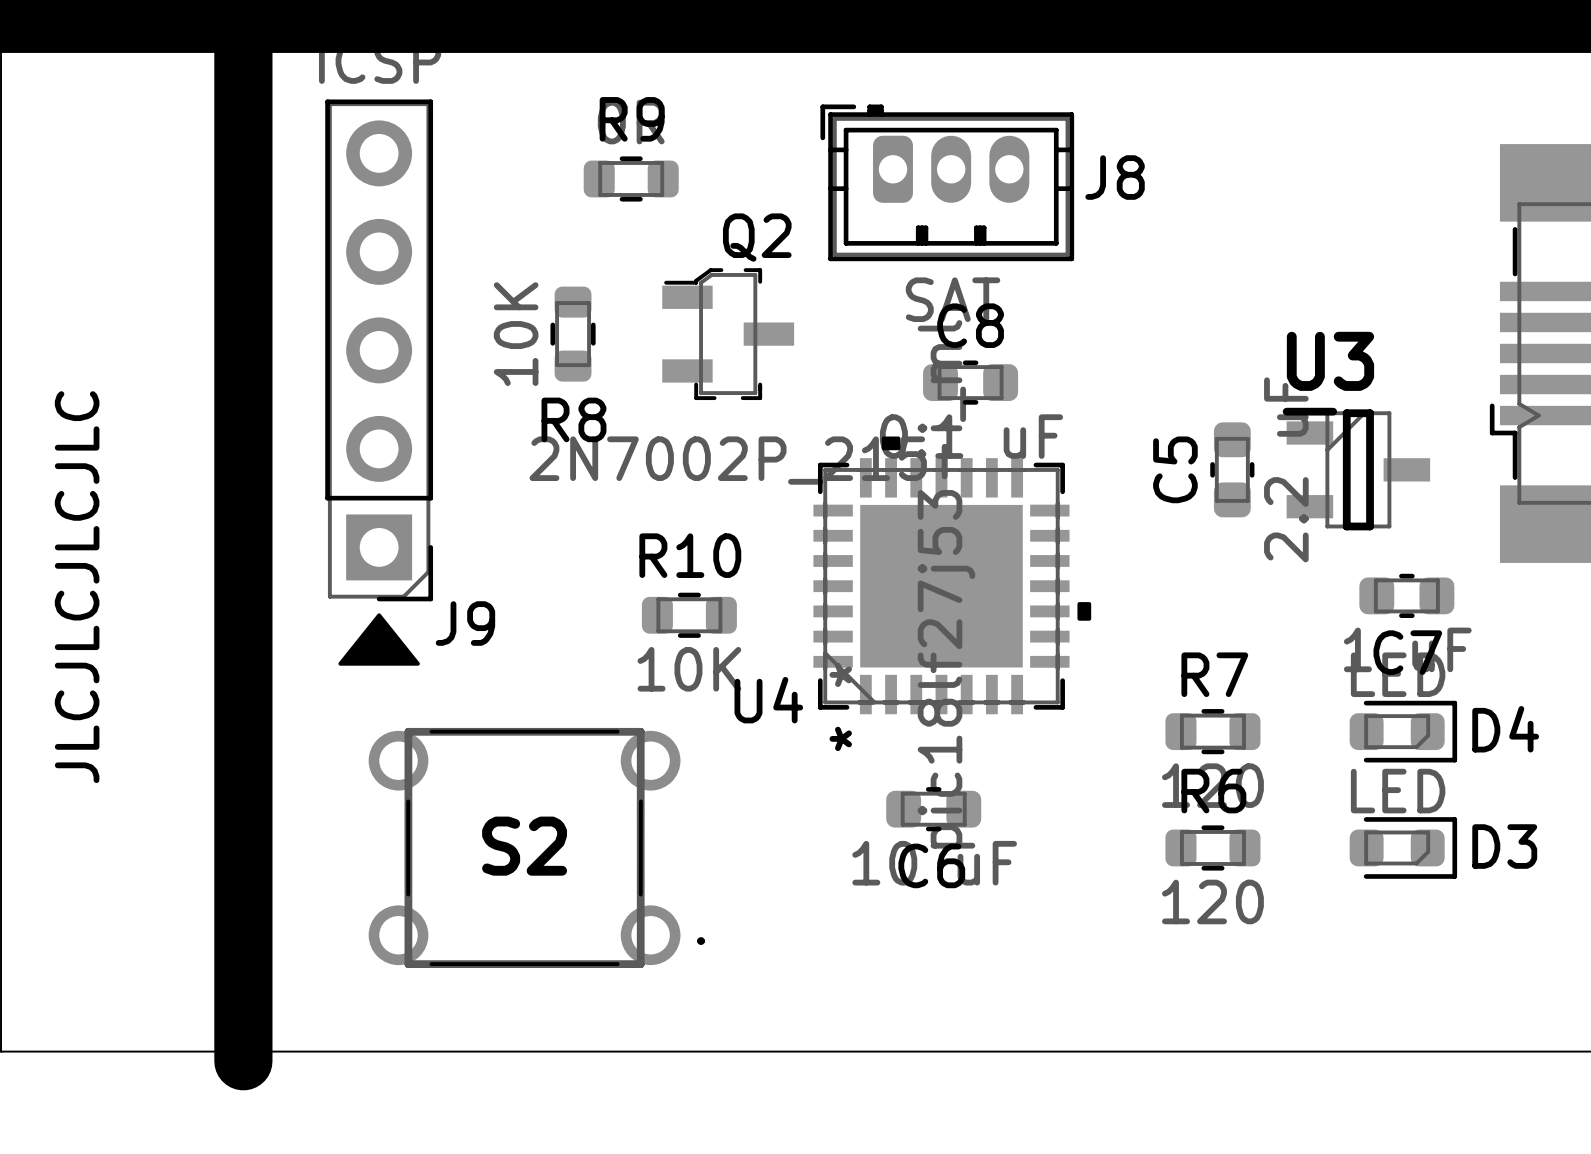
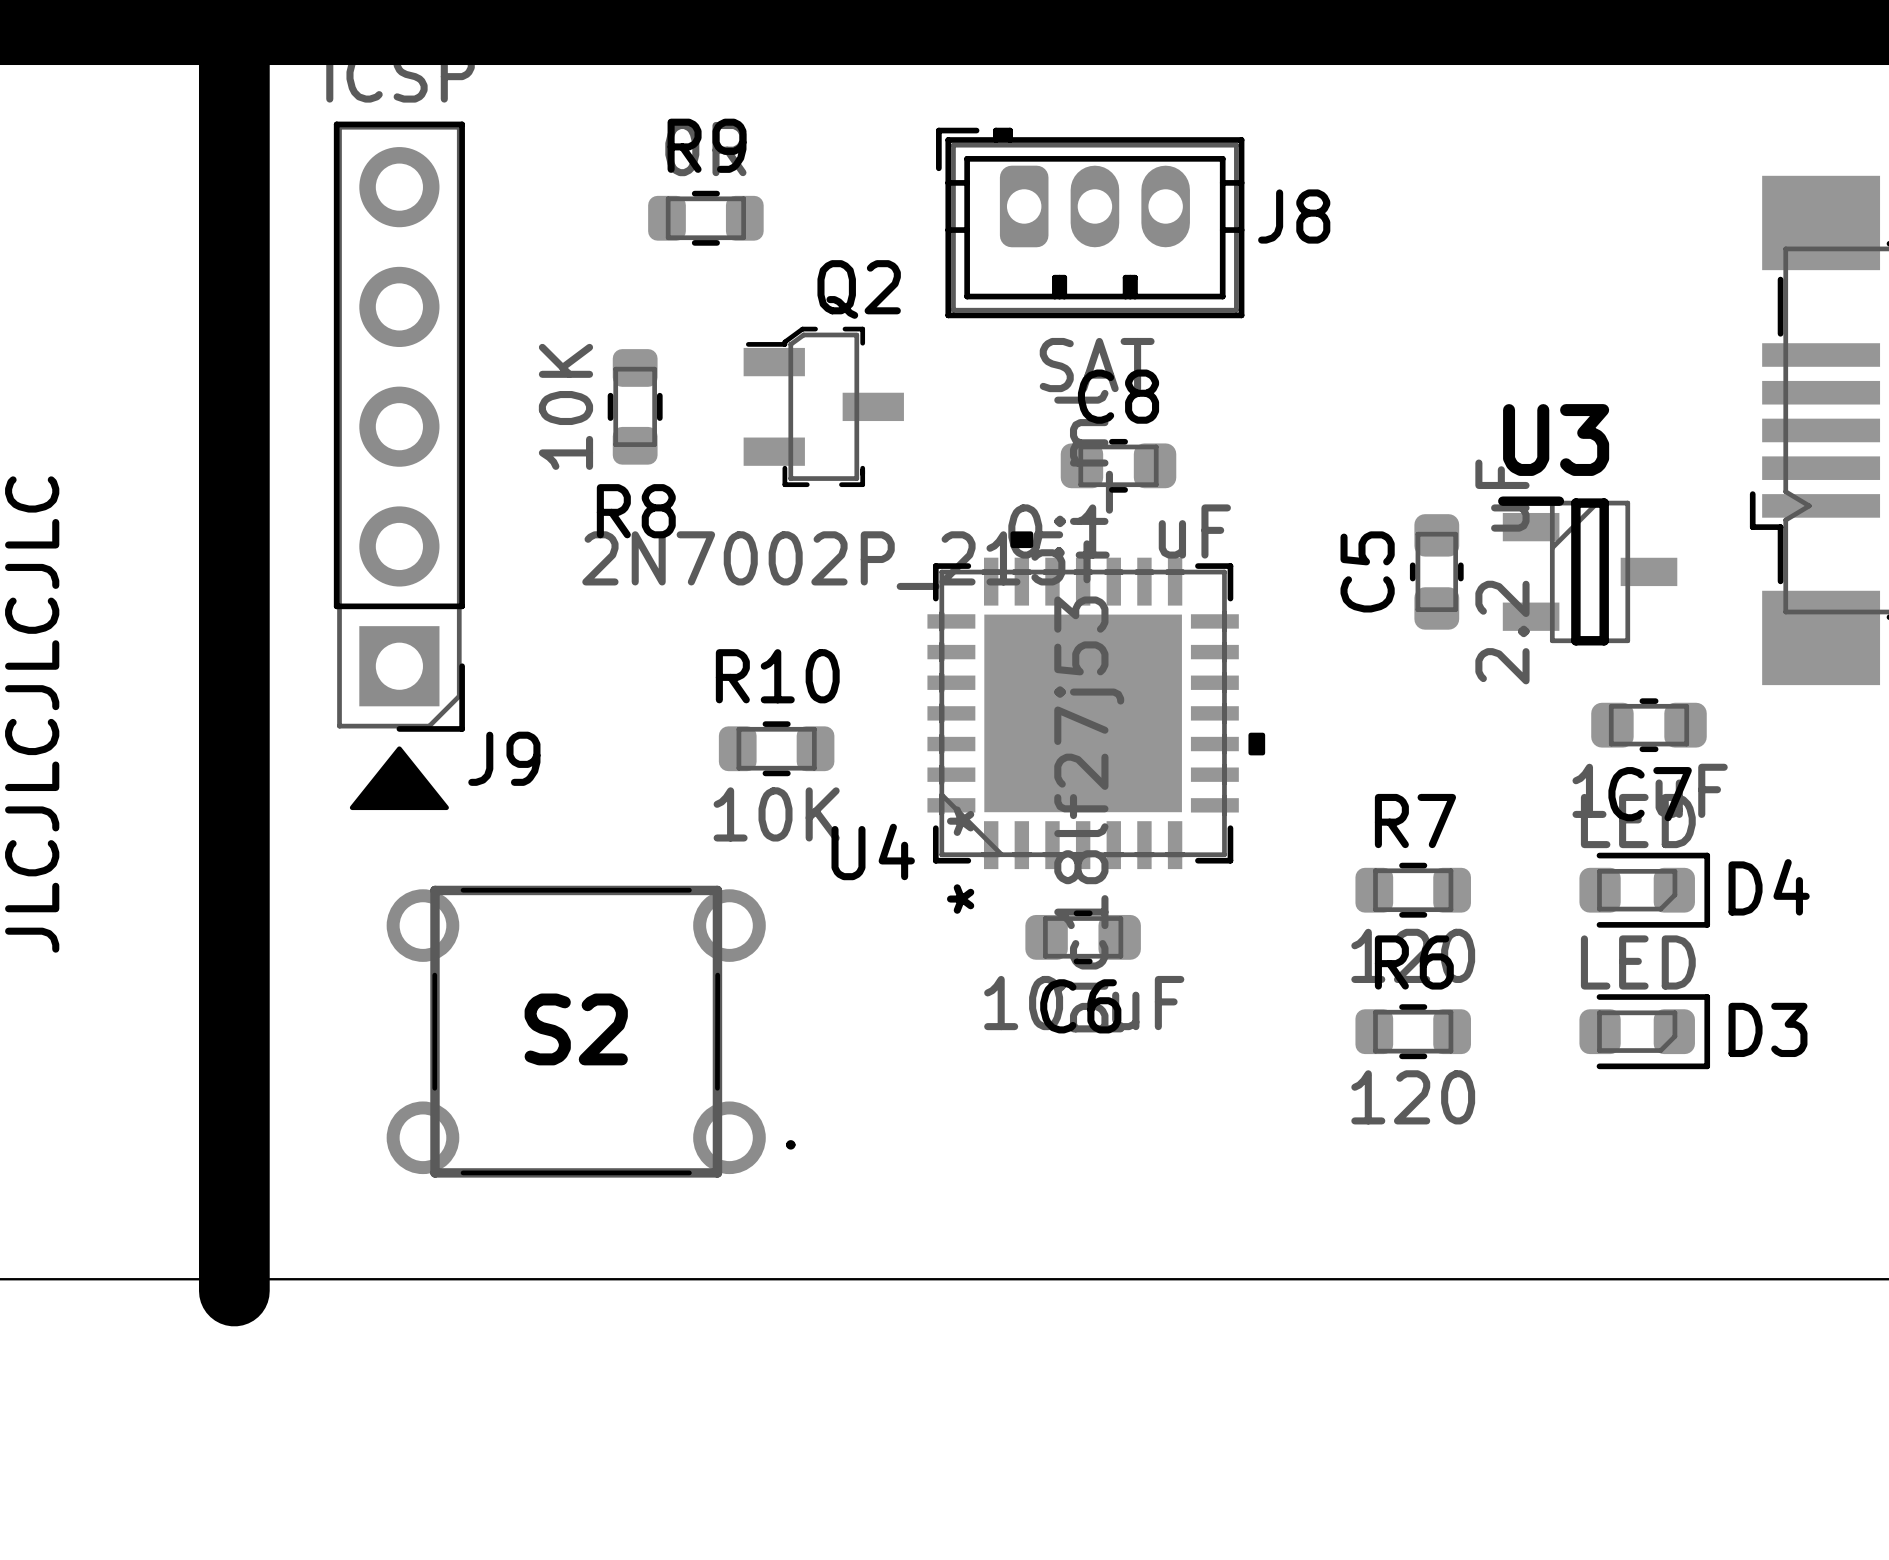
C6 position: (933, 809) -> (1083, 937)

